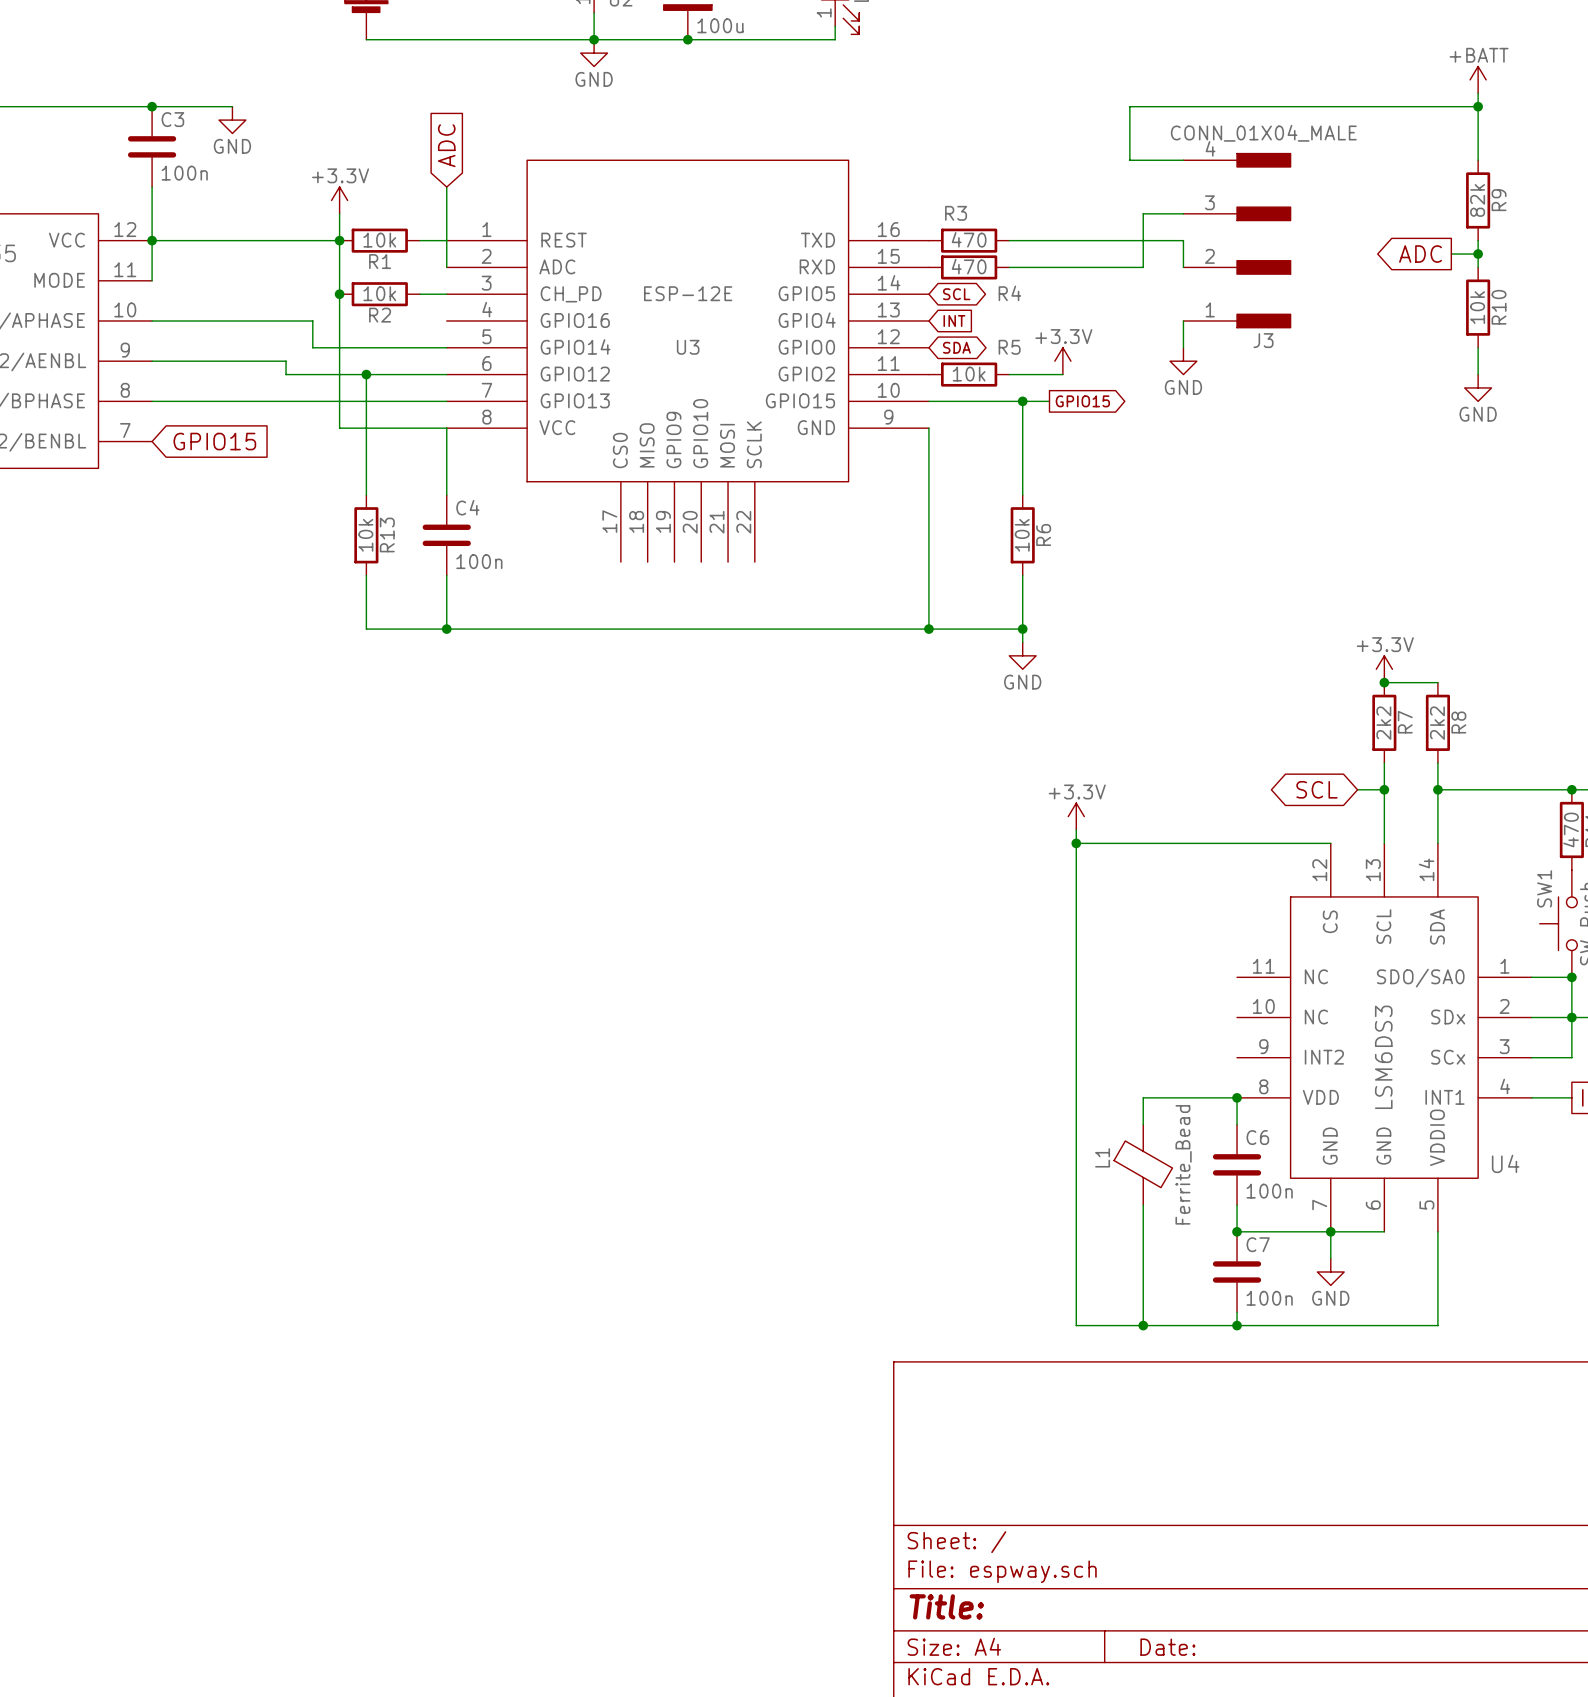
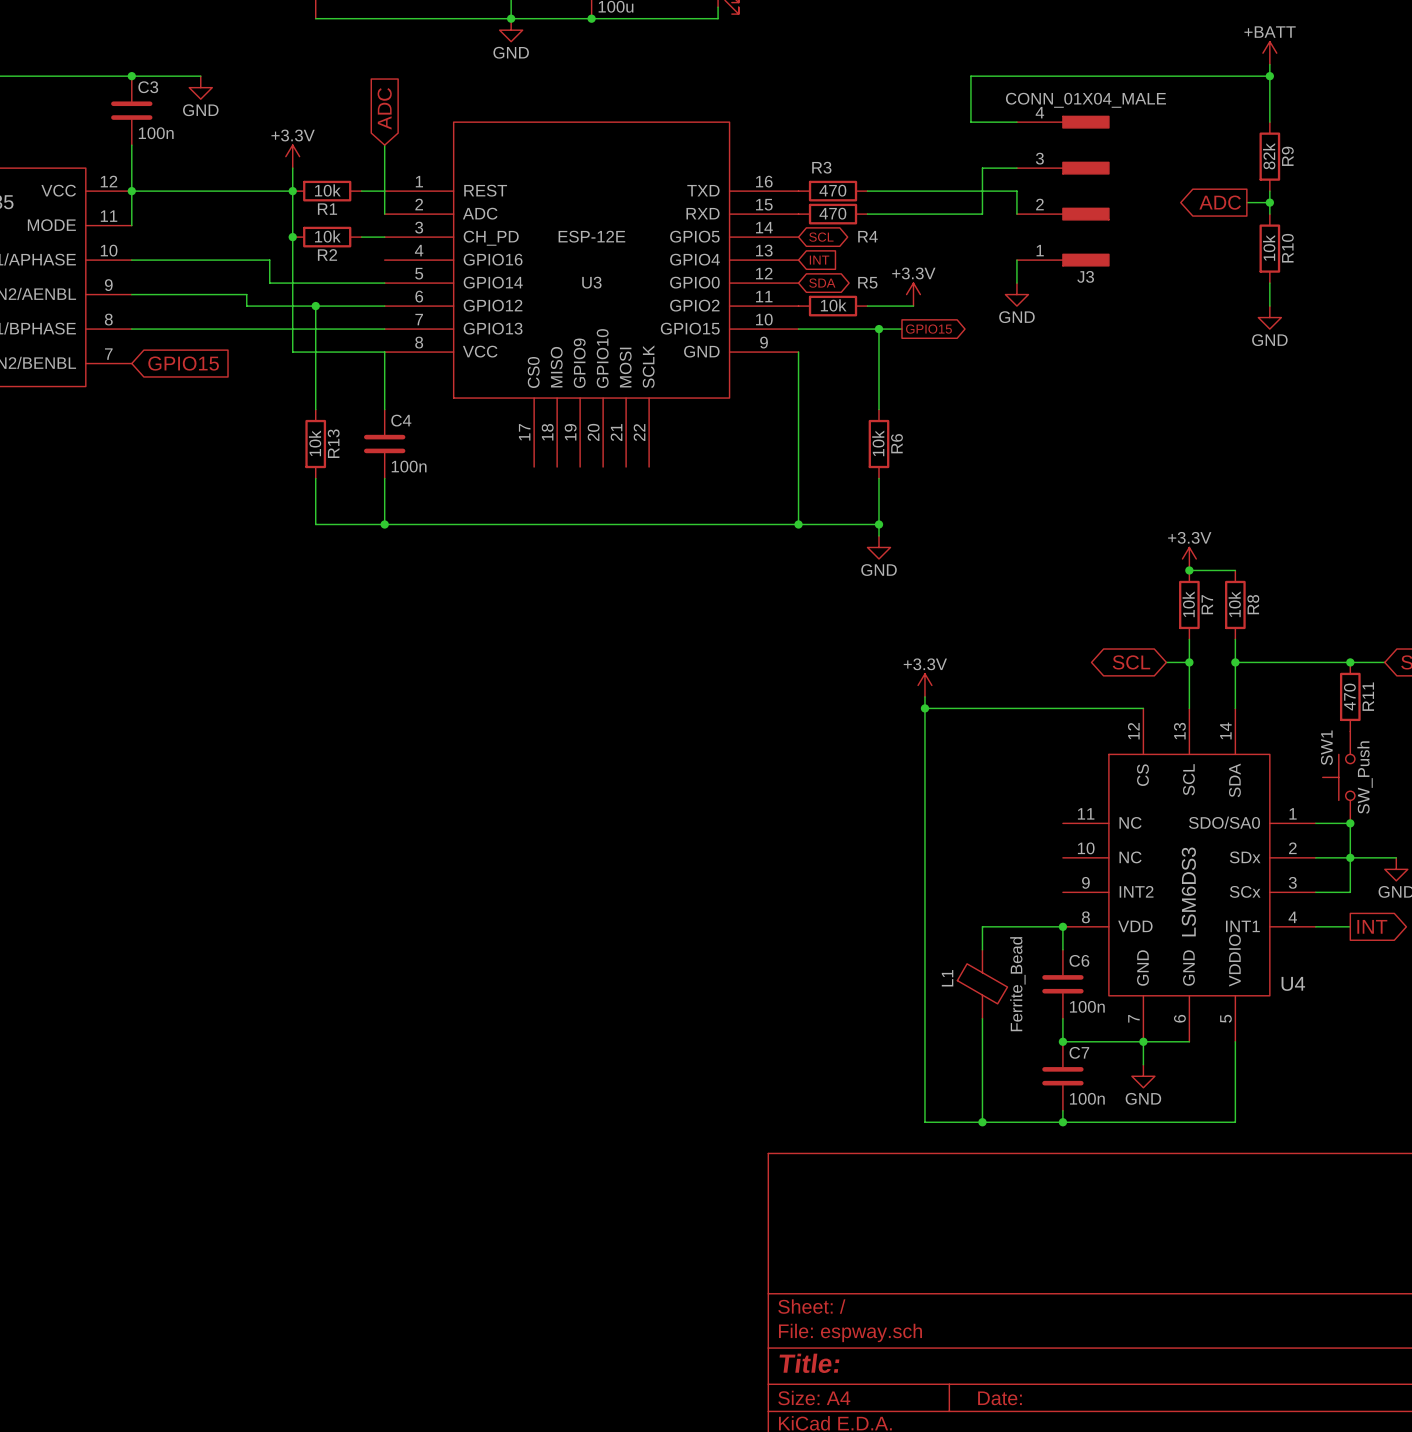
R7 value: 2k2 (1383, 723) -> 10k (1188, 604)
R8 value: 2k2 (1437, 723) -> 10k (1234, 604)

